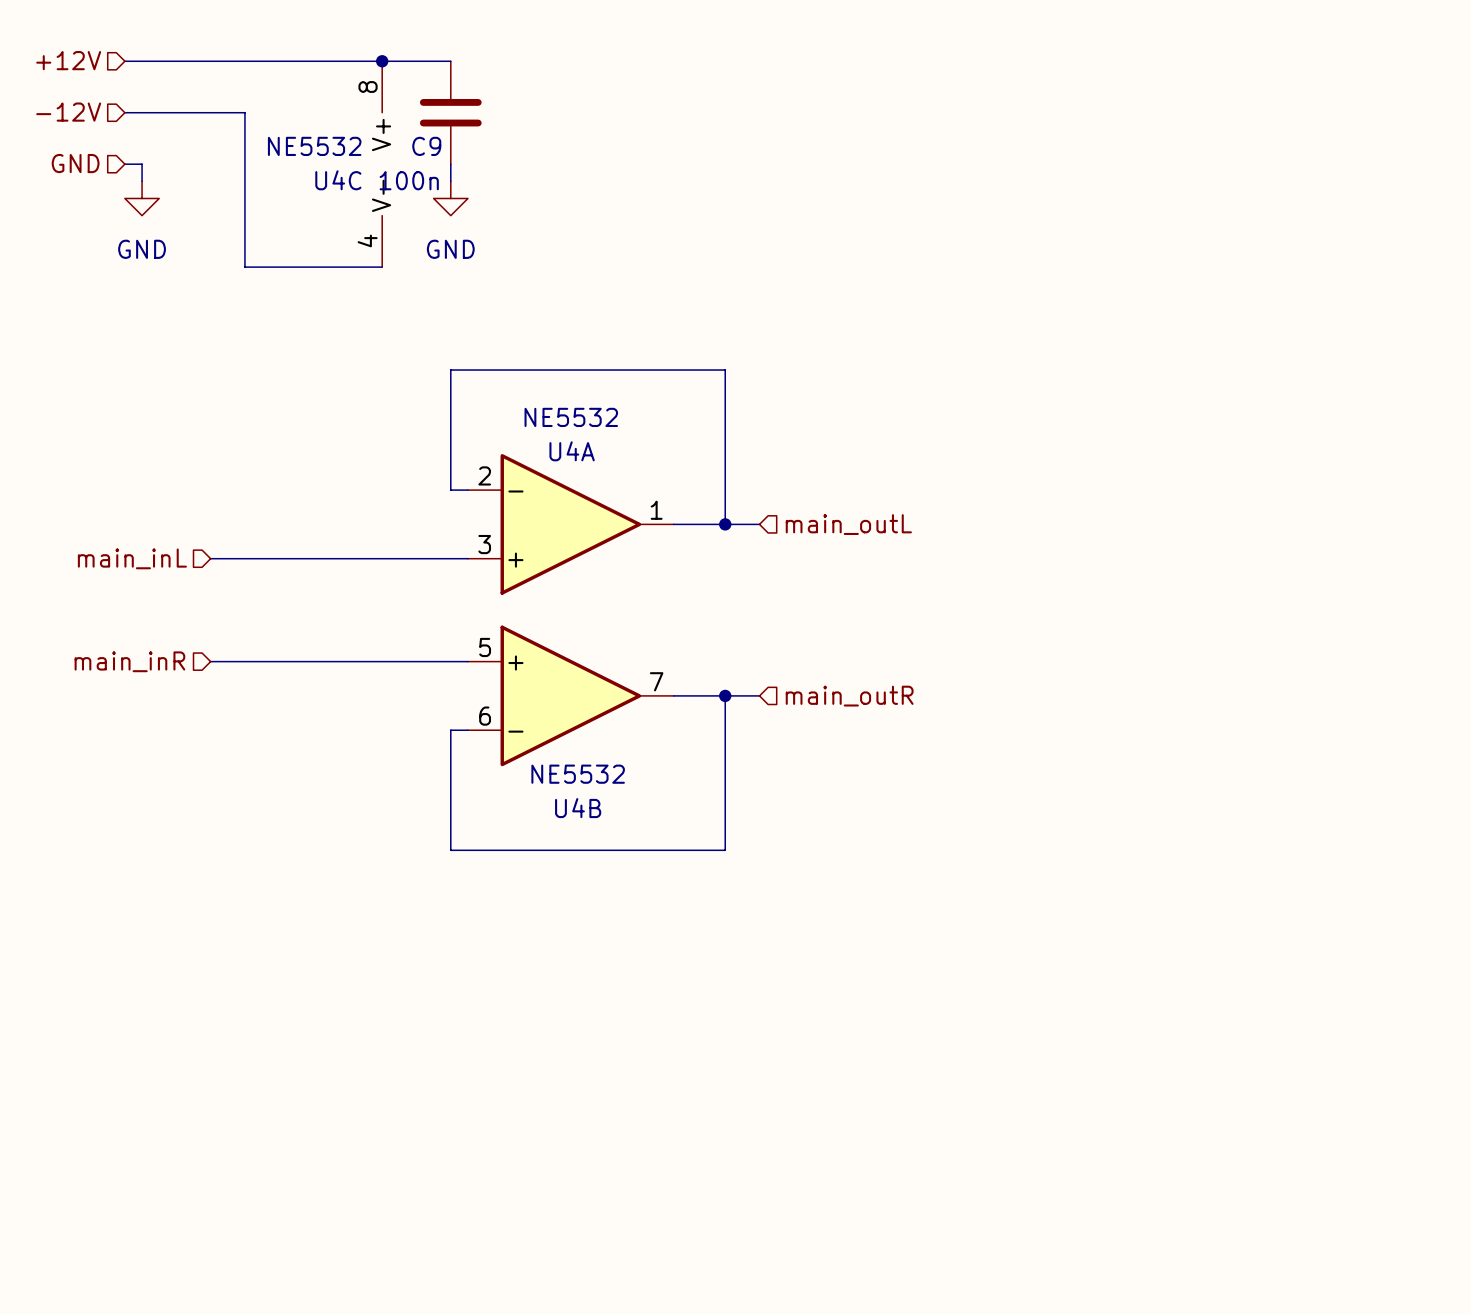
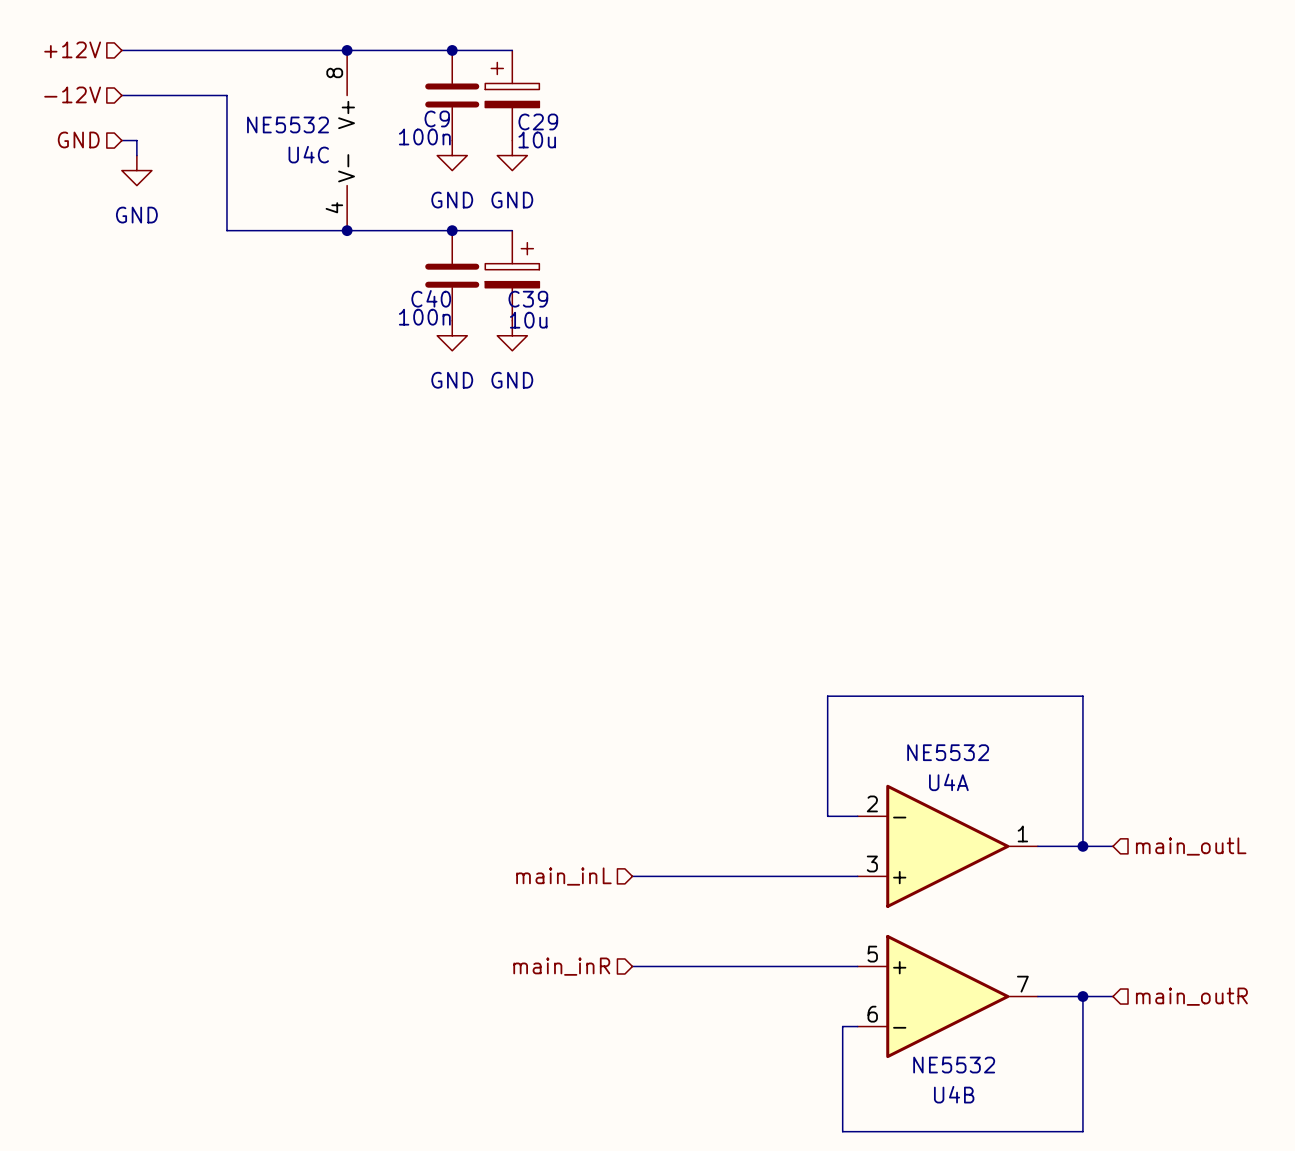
wire: none -> (407, 50) (512, 50)
junction: none -> (452, 50)
C9 position: (450, 112) -> (452, 95)
C29: none -> 10u (512, 95)
C9 name position: C9 (426, 146) -> C9 (437, 118)
wire: (450, 164) (450, 181) -> none
C9 value position: 100n (409, 180) -> 100n (424, 136)
power symbol: none -> GND (512, 155)
power symbol position: GND (450, 198) -> GND (452, 155)
wire: none -> (347, 230) (512, 230)
junction: none -> (347, 230)
junction: none -> (452, 230)
C40: none -> 100n (452, 275)
C39: none -> 10u (512, 275)
power symbol: none -> GND (452, 335)
power symbol: none -> GND (512, 335)
wire: (467, 490) (450, 490) (450, 370) (725, 370) (725, 524) -> none
U4A position: (570, 524) -> (947, 846)
wire: (673, 524) (759, 524) -> none
junction: (725, 524) -> none
hierarchical label: main_outL (848, 524) -> none
hierarchical label: main_inL (132, 558) -> none
wire: (210, 558) (467, 558) -> none
hierarchical label: main_inR (129, 661) -> none
wire: (210, 661) (467, 661) -> none
U4B position: (570, 695) -> (947, 996)
wire: (673, 695) (759, 695) -> none
wire: (725, 695) (725, 850) (450, 850) (450, 730) (467, 730) -> none
junction: (725, 695) -> none
hierarchical label: main_outR (849, 696) -> none
wire: none -> (857, 816) (827, 816) (827, 696) (1082, 696) (1082, 846)
wire: none -> (1037, 846) (1112, 846)
junction: none -> (1082, 846)
hierarchical label: none -> main_outL (1191, 846)
hierarchical label: none -> main_inL (563, 876)
wire: none -> (632, 876) (857, 876)
hierarchical label: none -> main_inR (561, 966)
wire: none -> (632, 966) (857, 966)
wire: none -> (1037, 996) (1112, 996)
wire: none -> (1082, 996) (1082, 1131) (842, 1131) (842, 1026) (857, 1026)
junction: none -> (1082, 996)
hierarchical label: none -> main_outR (1191, 996)

